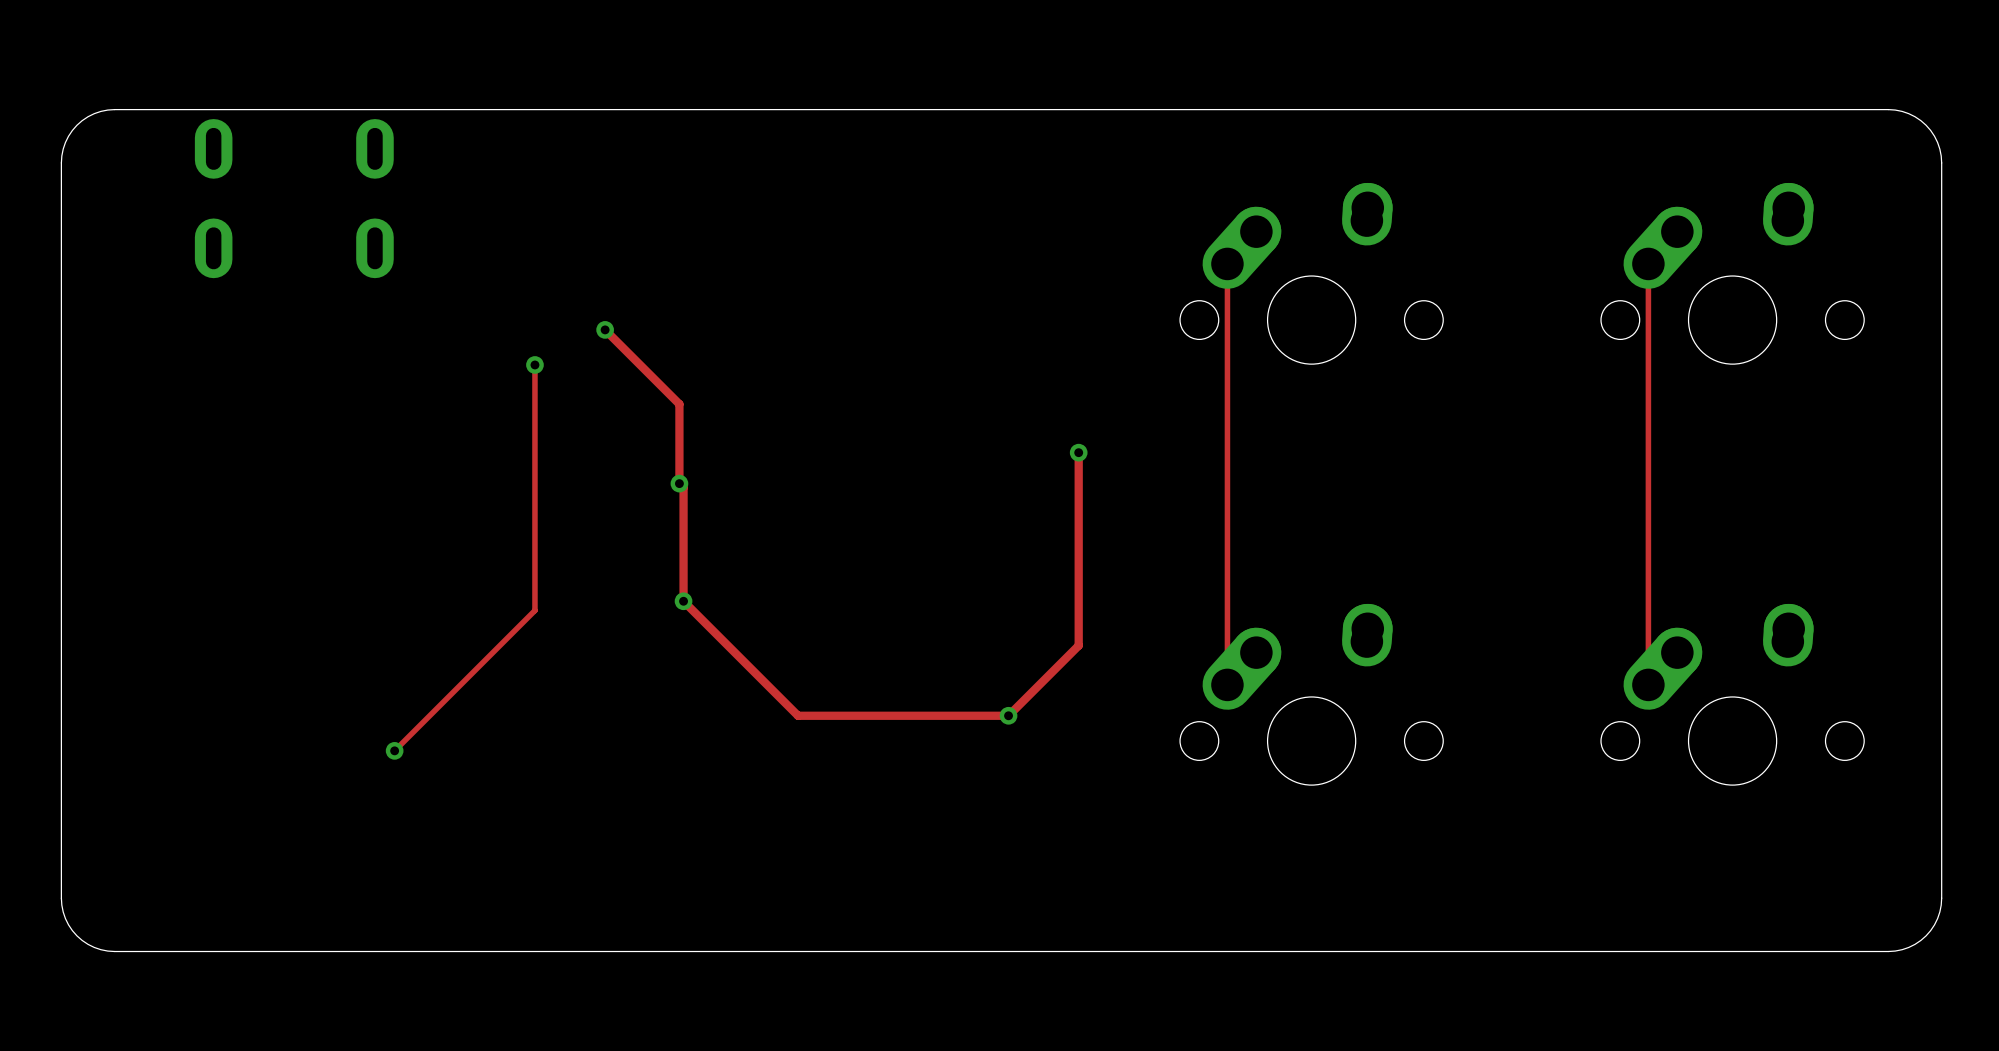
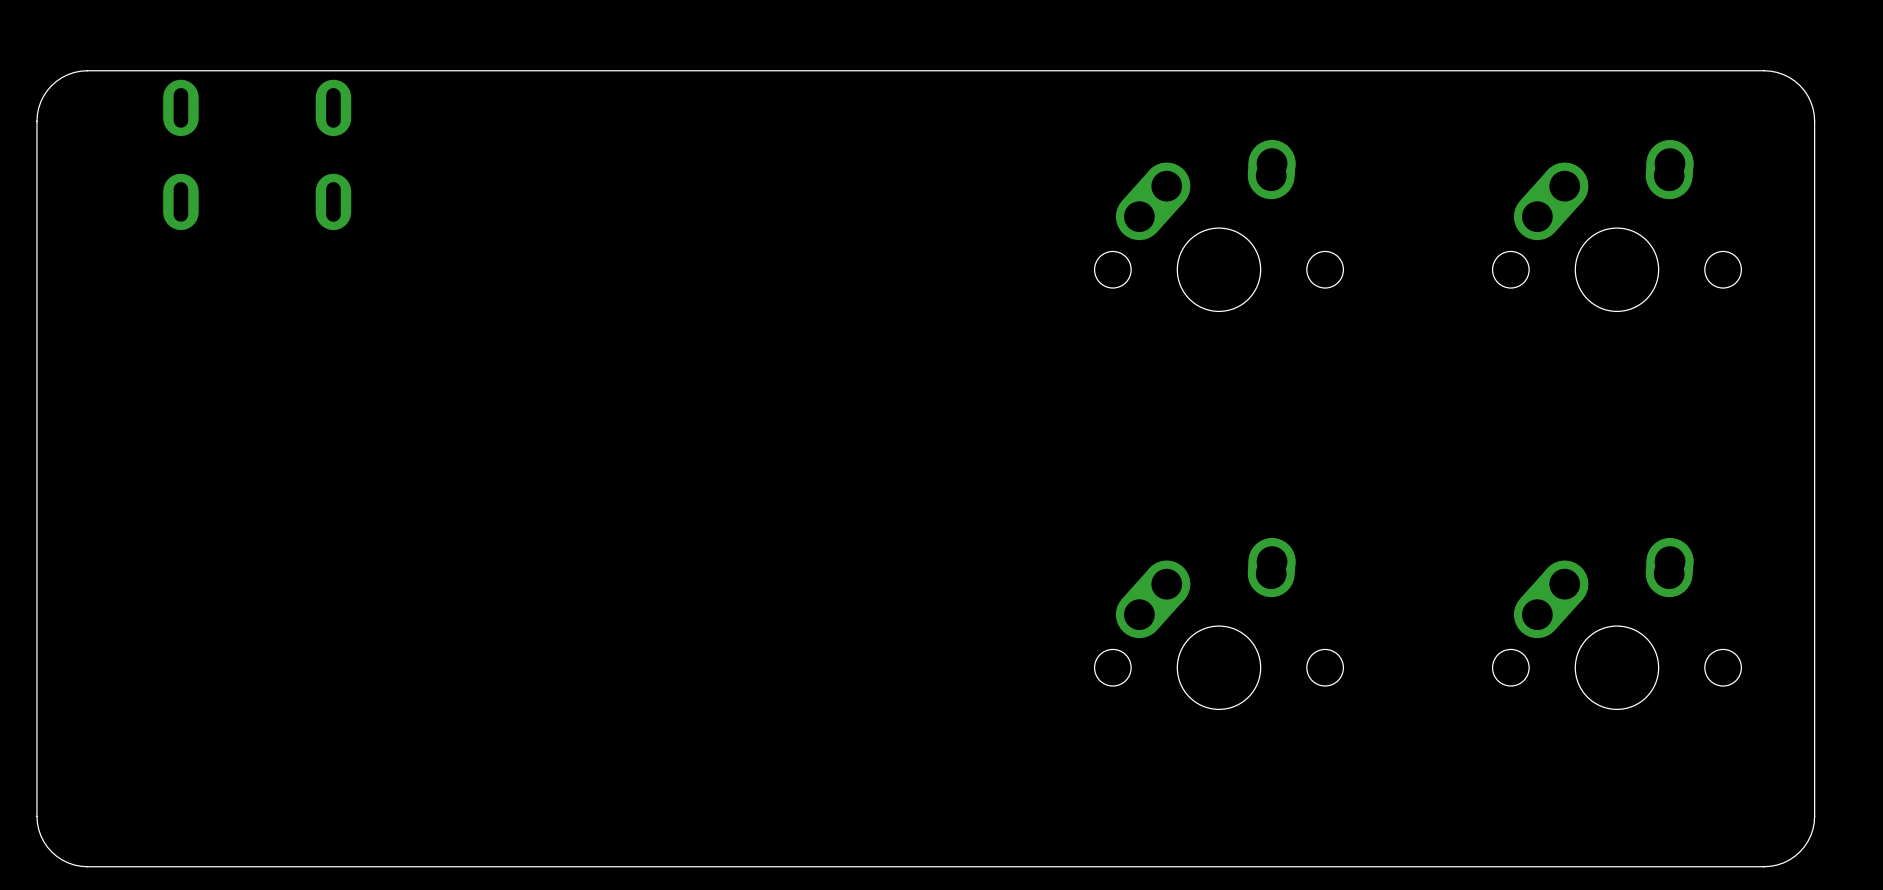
track: (1227, 263) (1227, 684) -> none
track: (1648, 263) (1648, 684) -> none
track: (605, 329) (679, 404) (679, 483) (683, 487) (683, 601) (798, 715) (1008, 715) (1078, 645) (1078, 452) -> none
via: (605, 329) -> none
track: (534, 364) (534, 610) (394, 750) -> none
via: (534, 364) -> none
via: (1078, 452) -> none
via: (679, 483) -> none
via: (683, 601) -> none
via: (1008, 715) -> none
via: (394, 750) -> none

